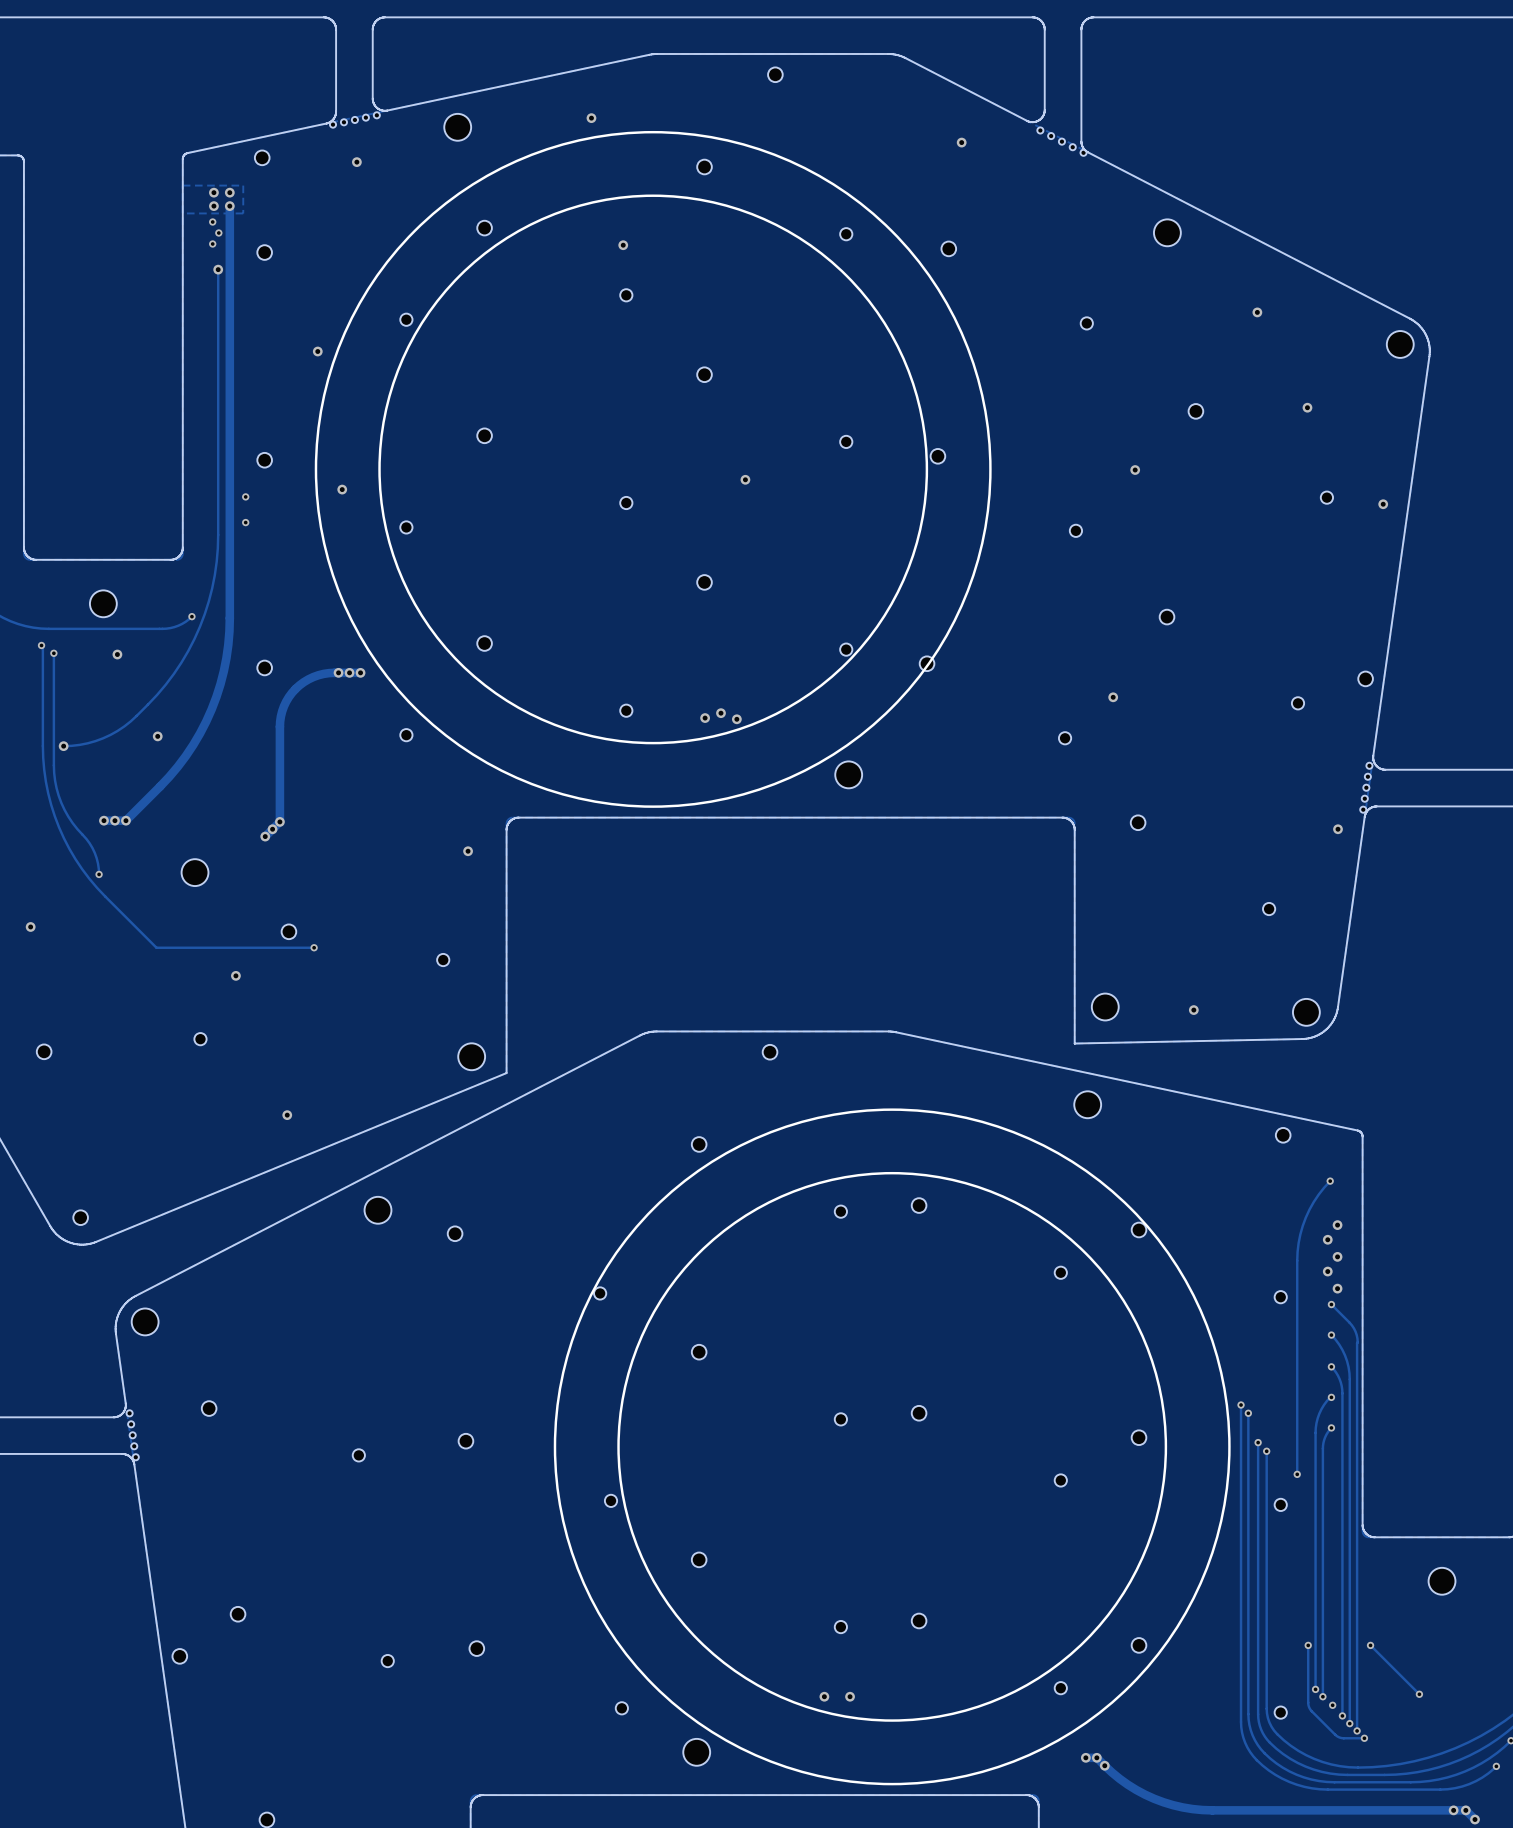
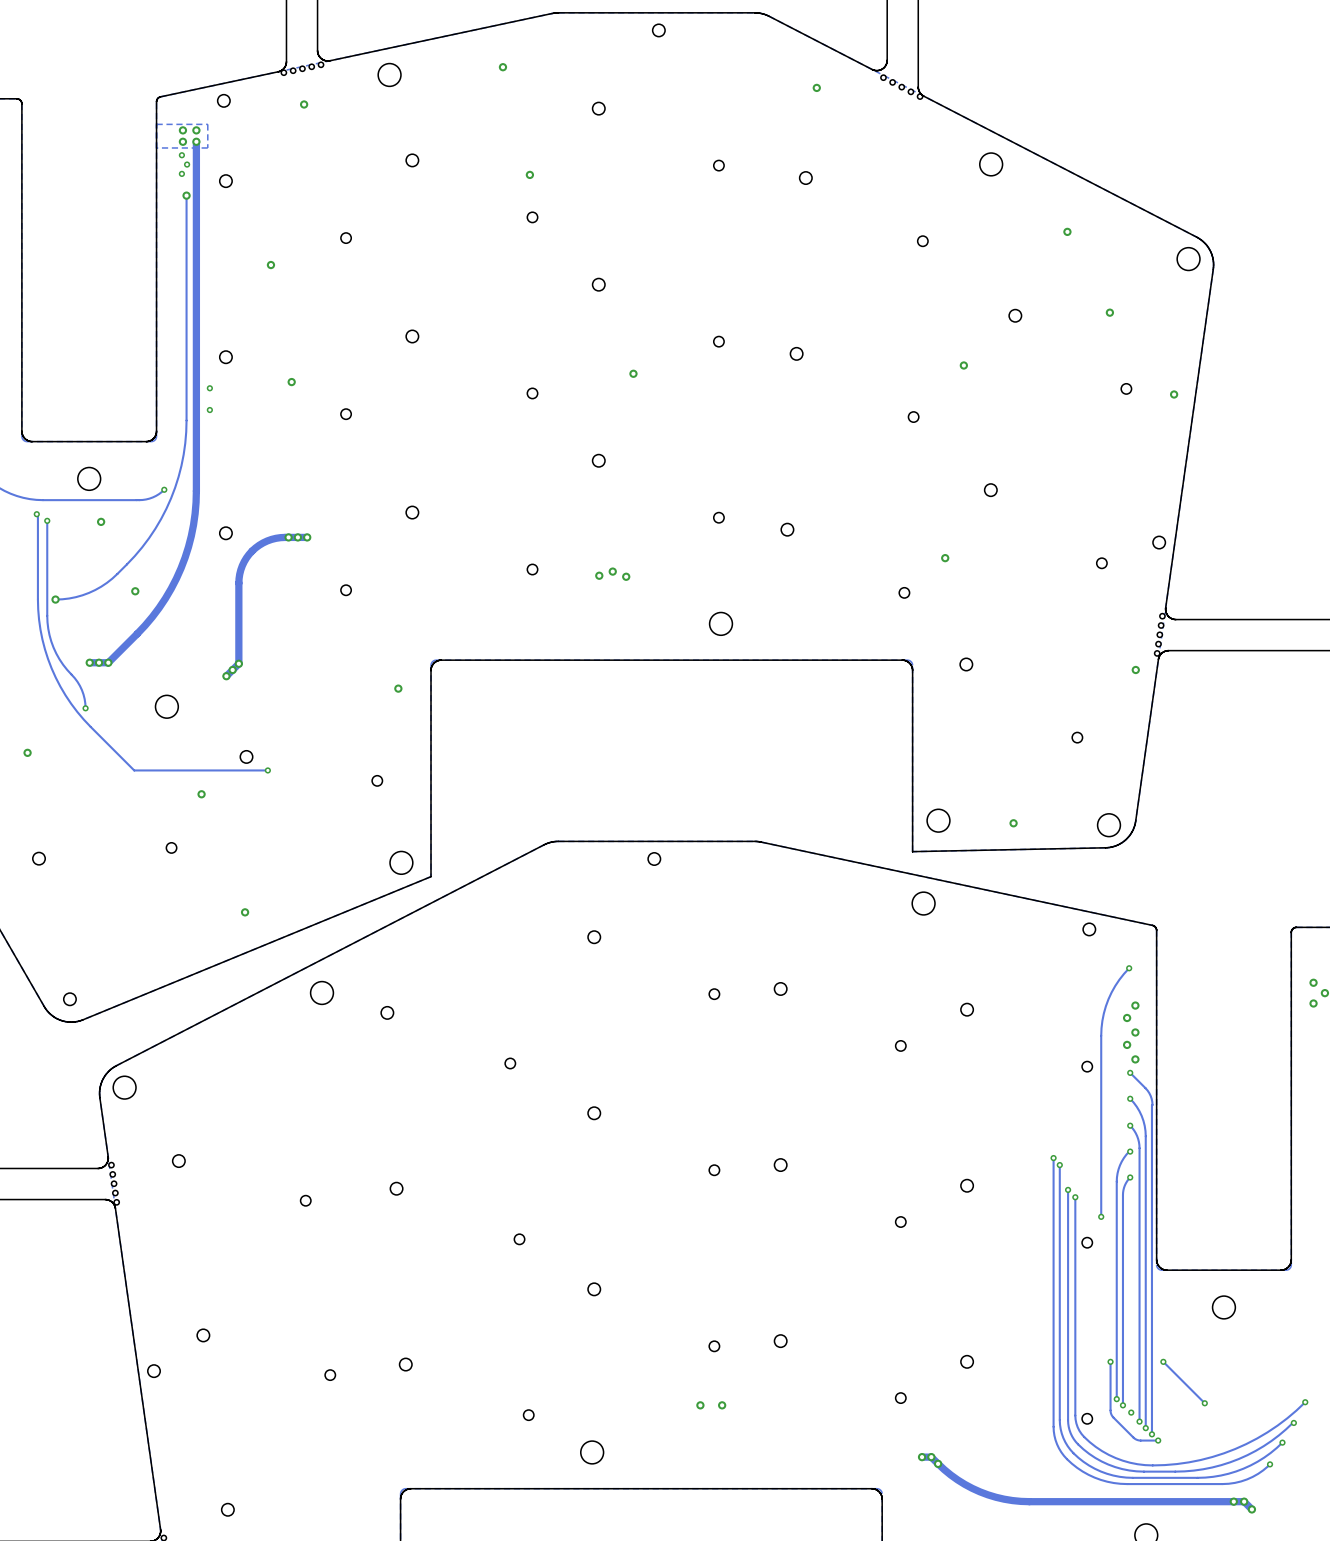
drawing: [314, 130, 992, 808] -> none
drawing: [553, 1108, 1231, 1786] -> none

